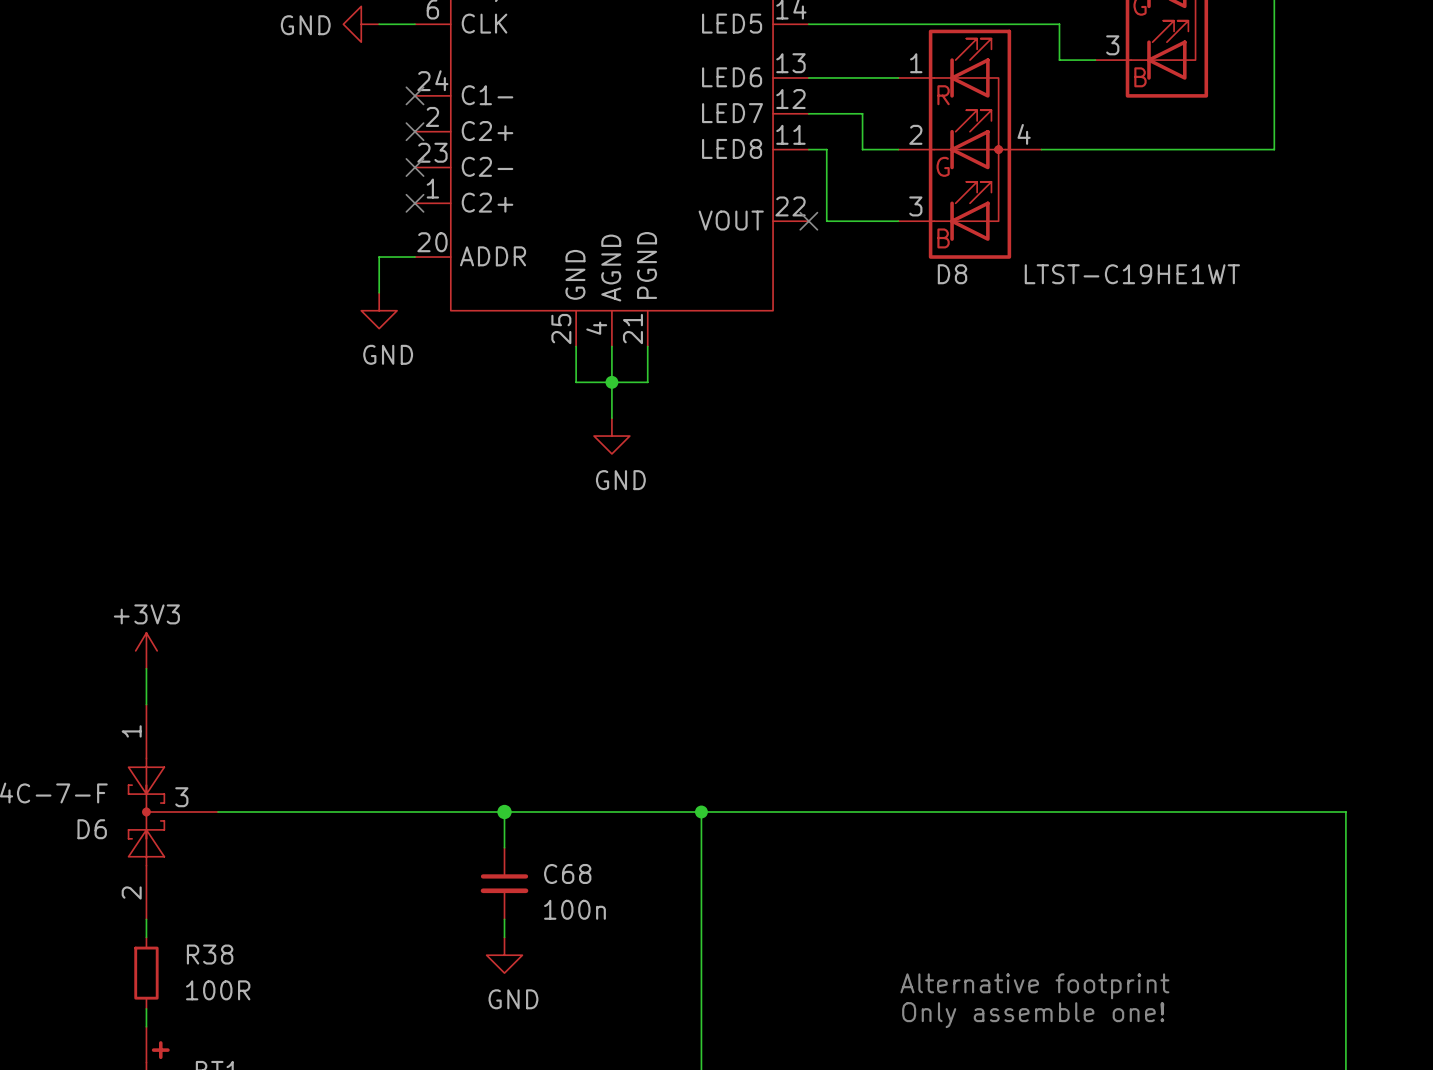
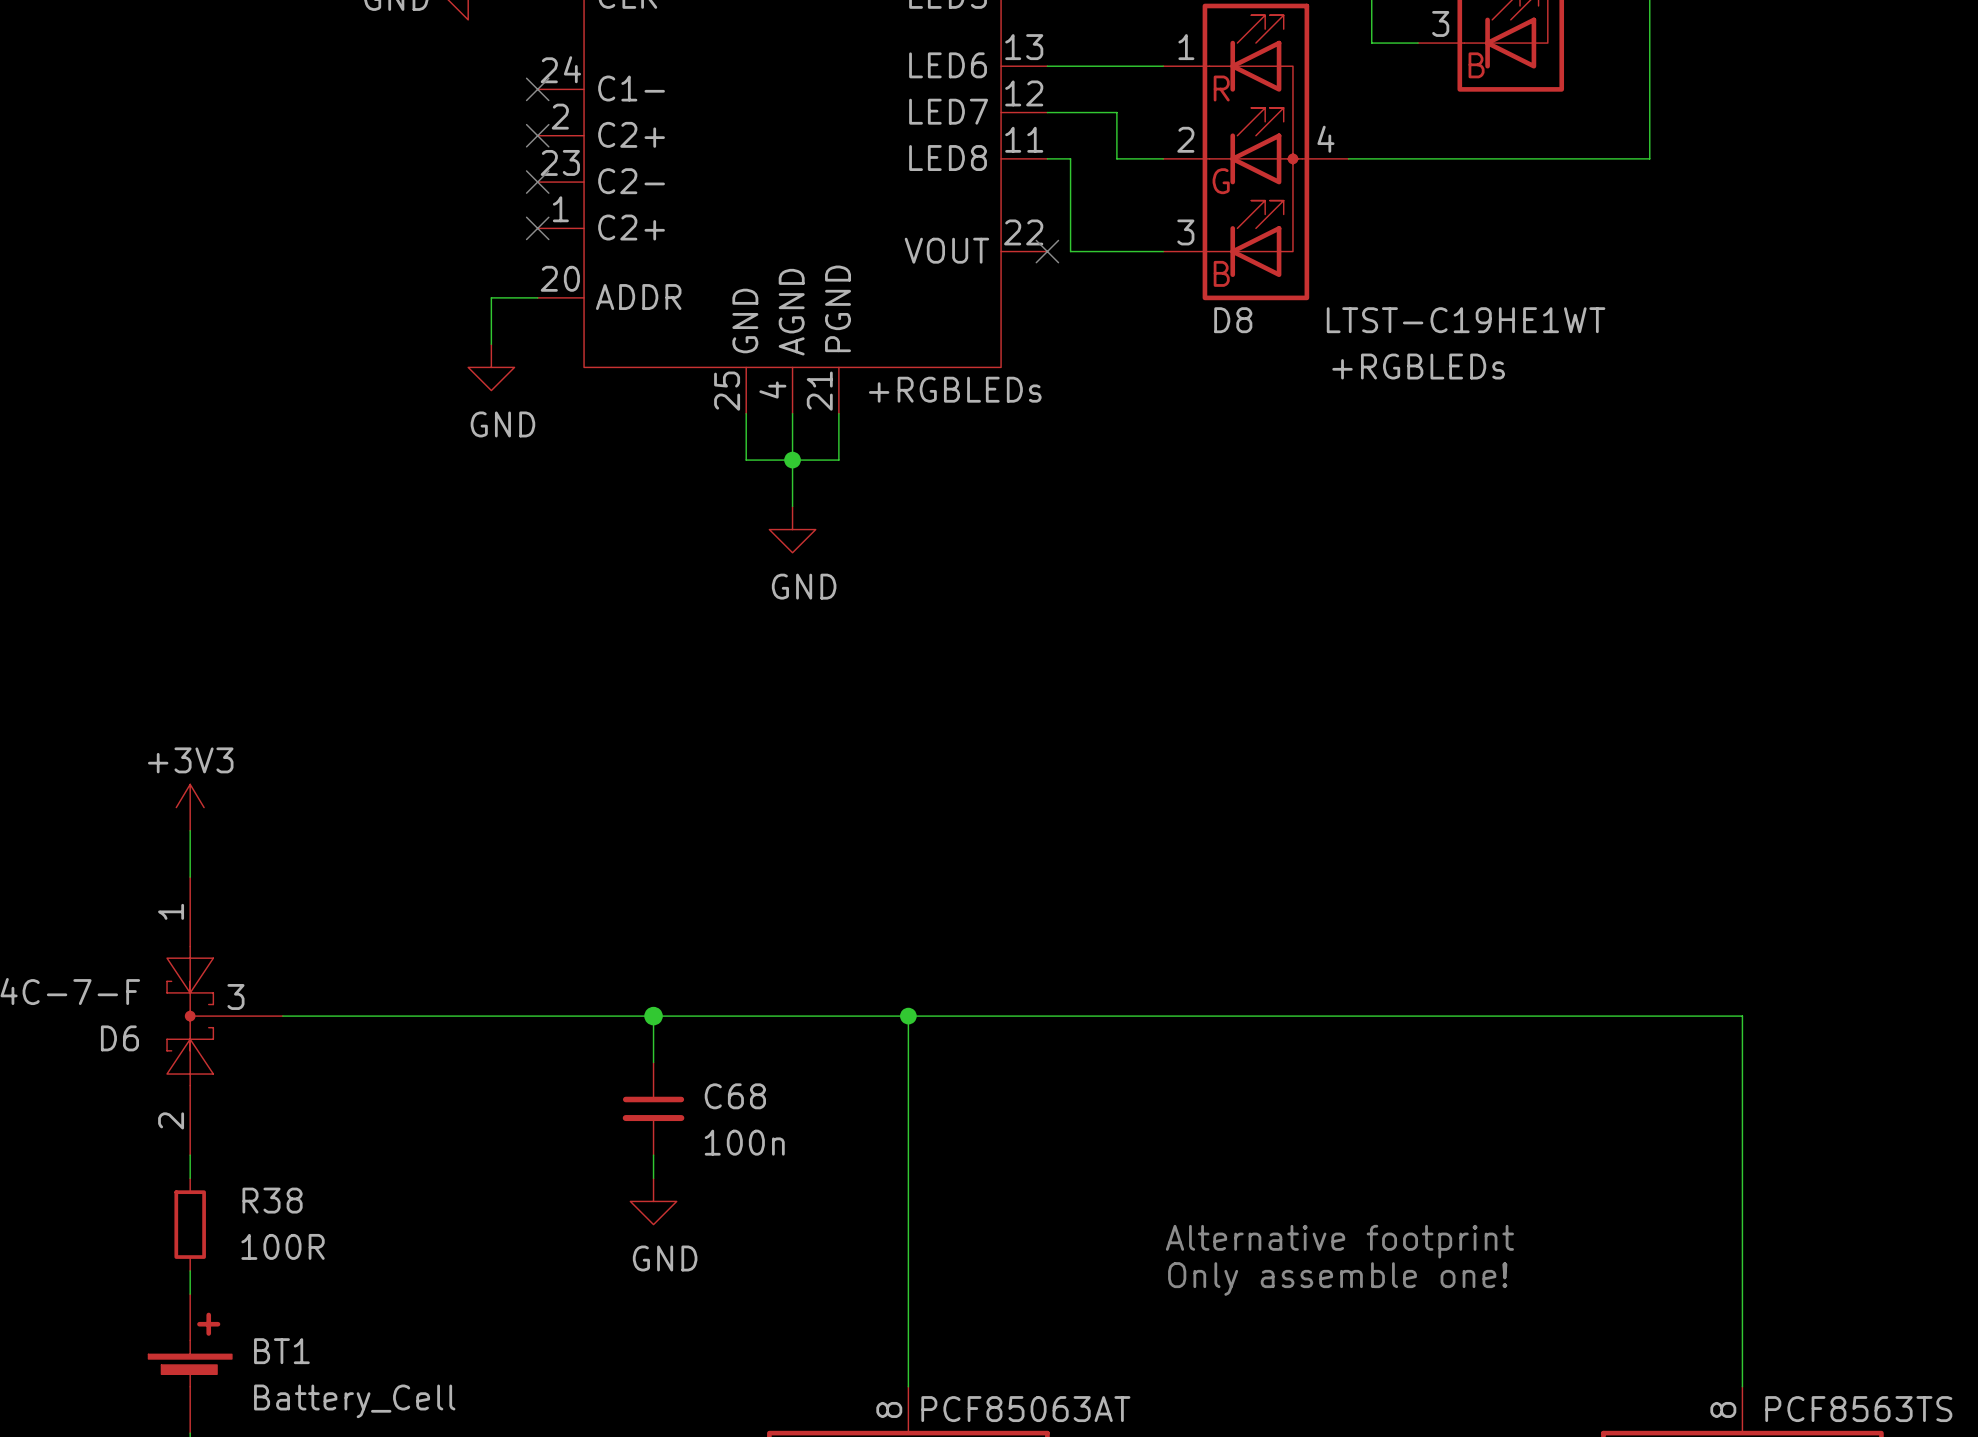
D8 text: none -> +RGBLEDs (1418, 366)
part text: none -> +RGBLEDs (955, 389)

